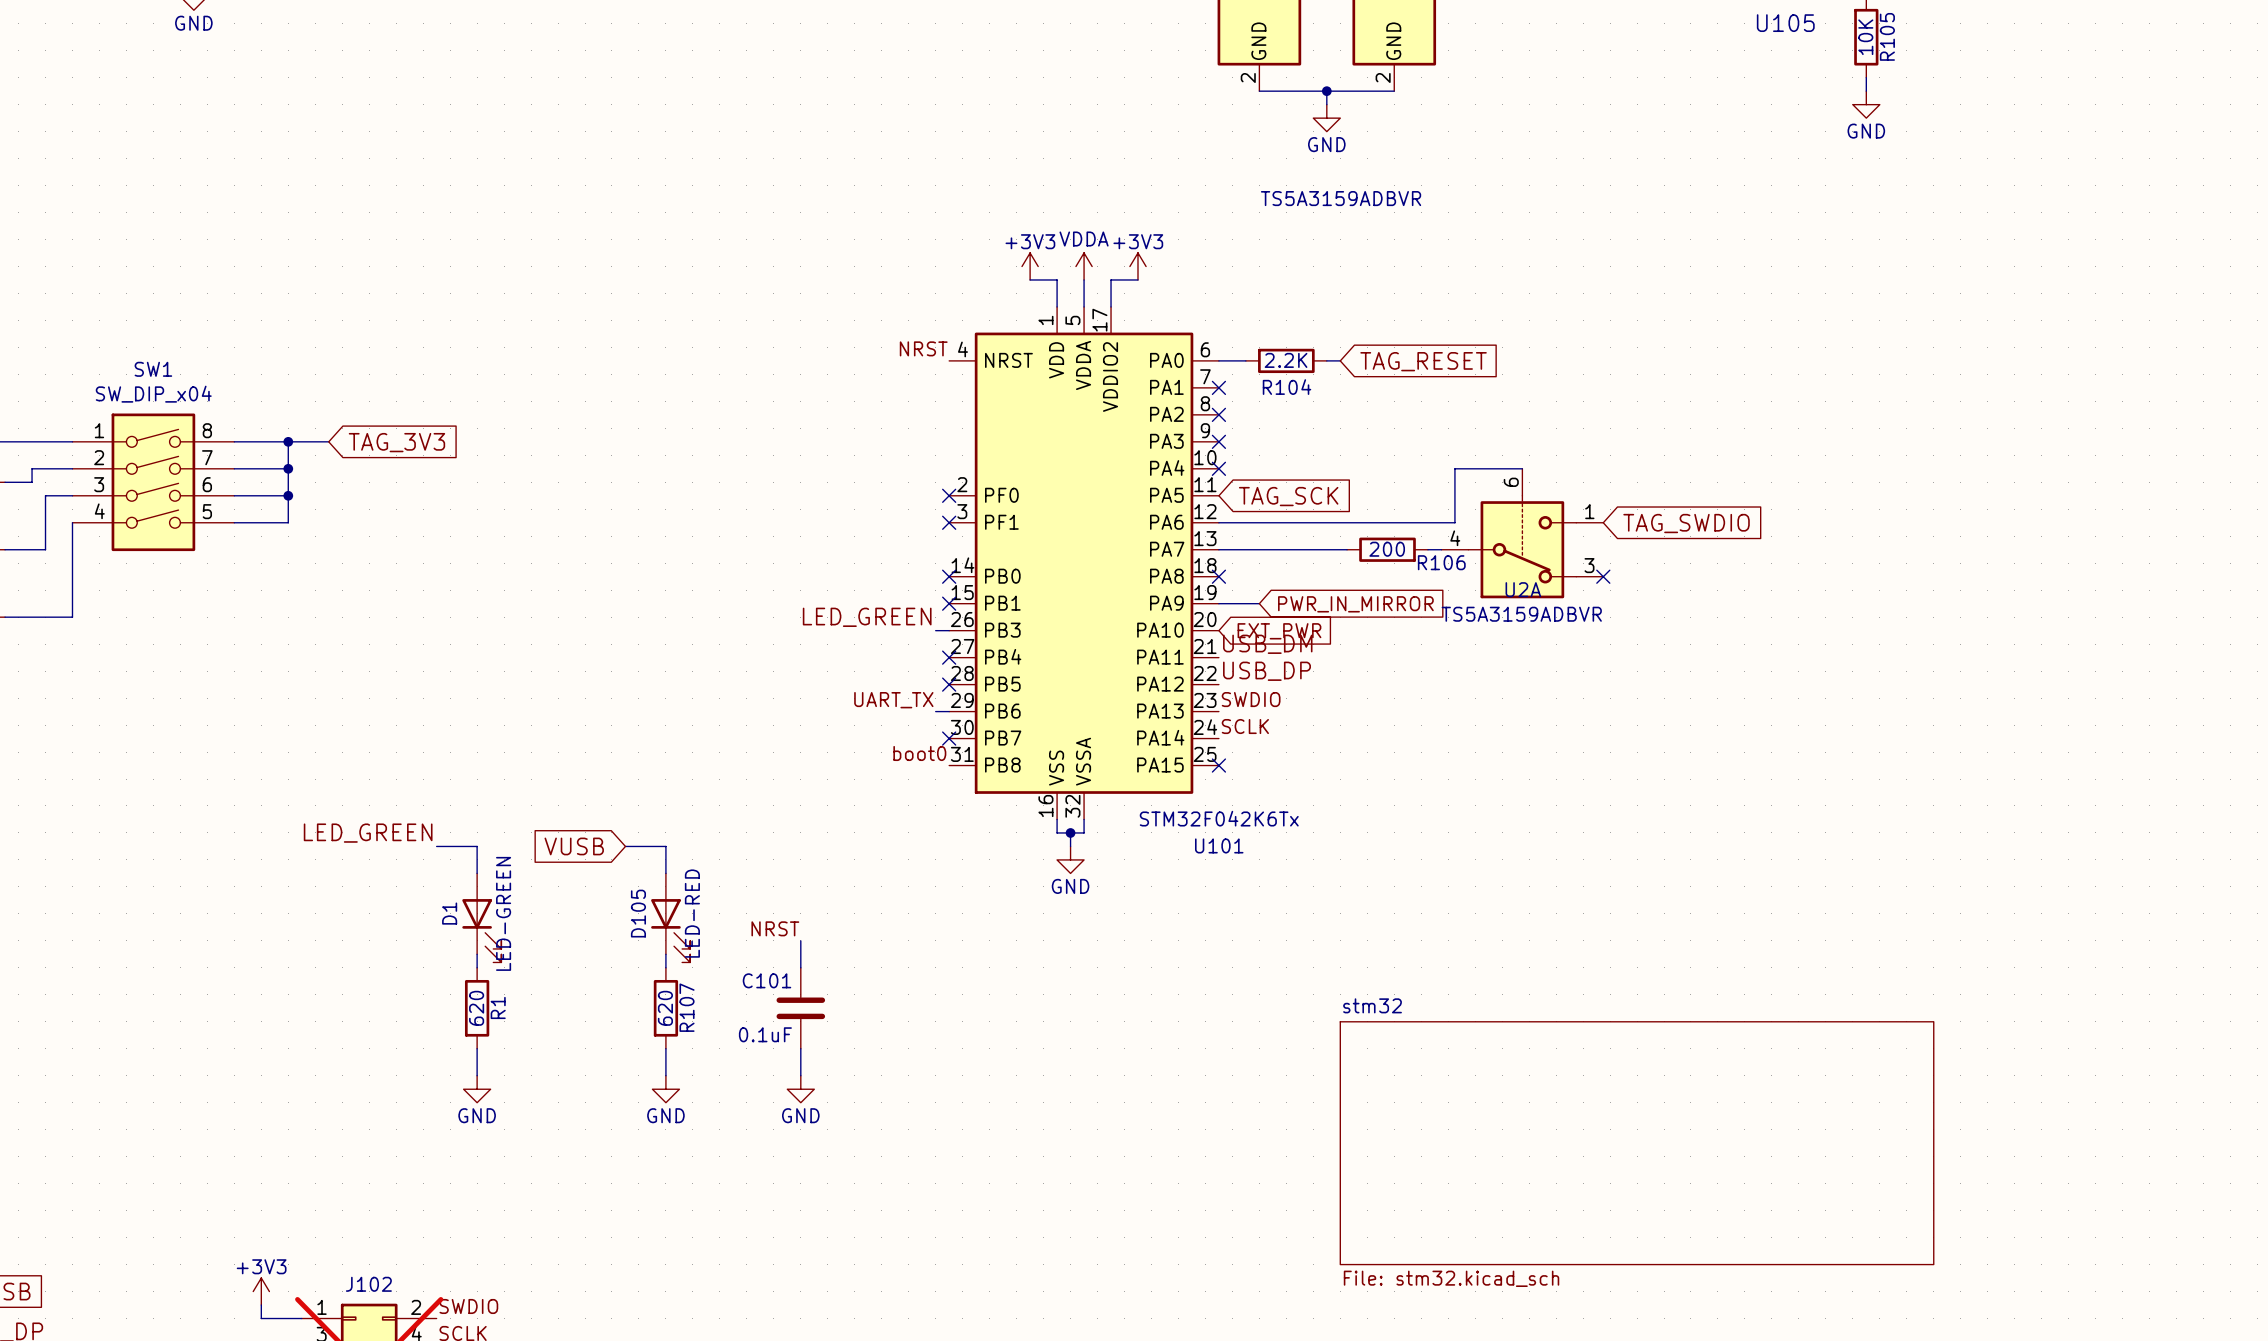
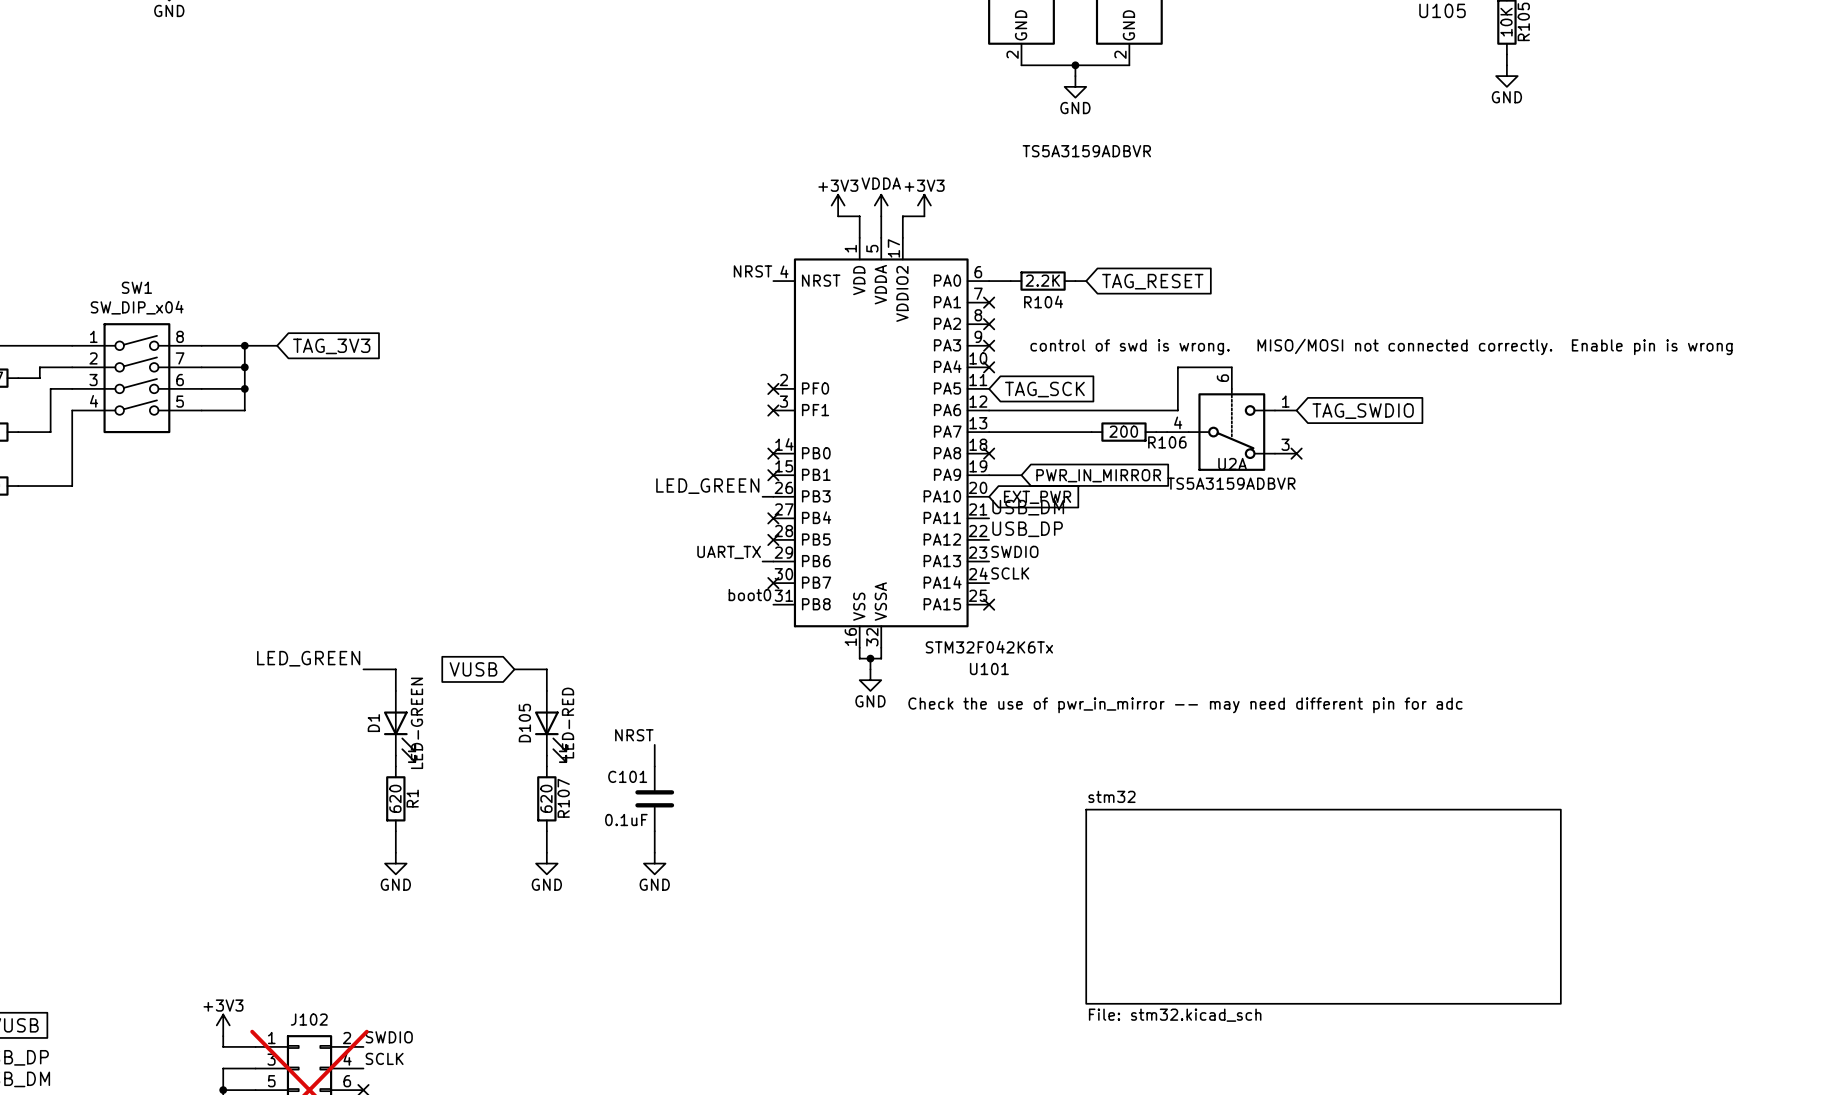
text: none -> control of swd is wrong. MISO/MOSI not connected correctly. Enable pin is wrong (1381, 346)
text: none -> Check the use of pwr_in_mirror -- may need different pin for adc (1185, 705)

